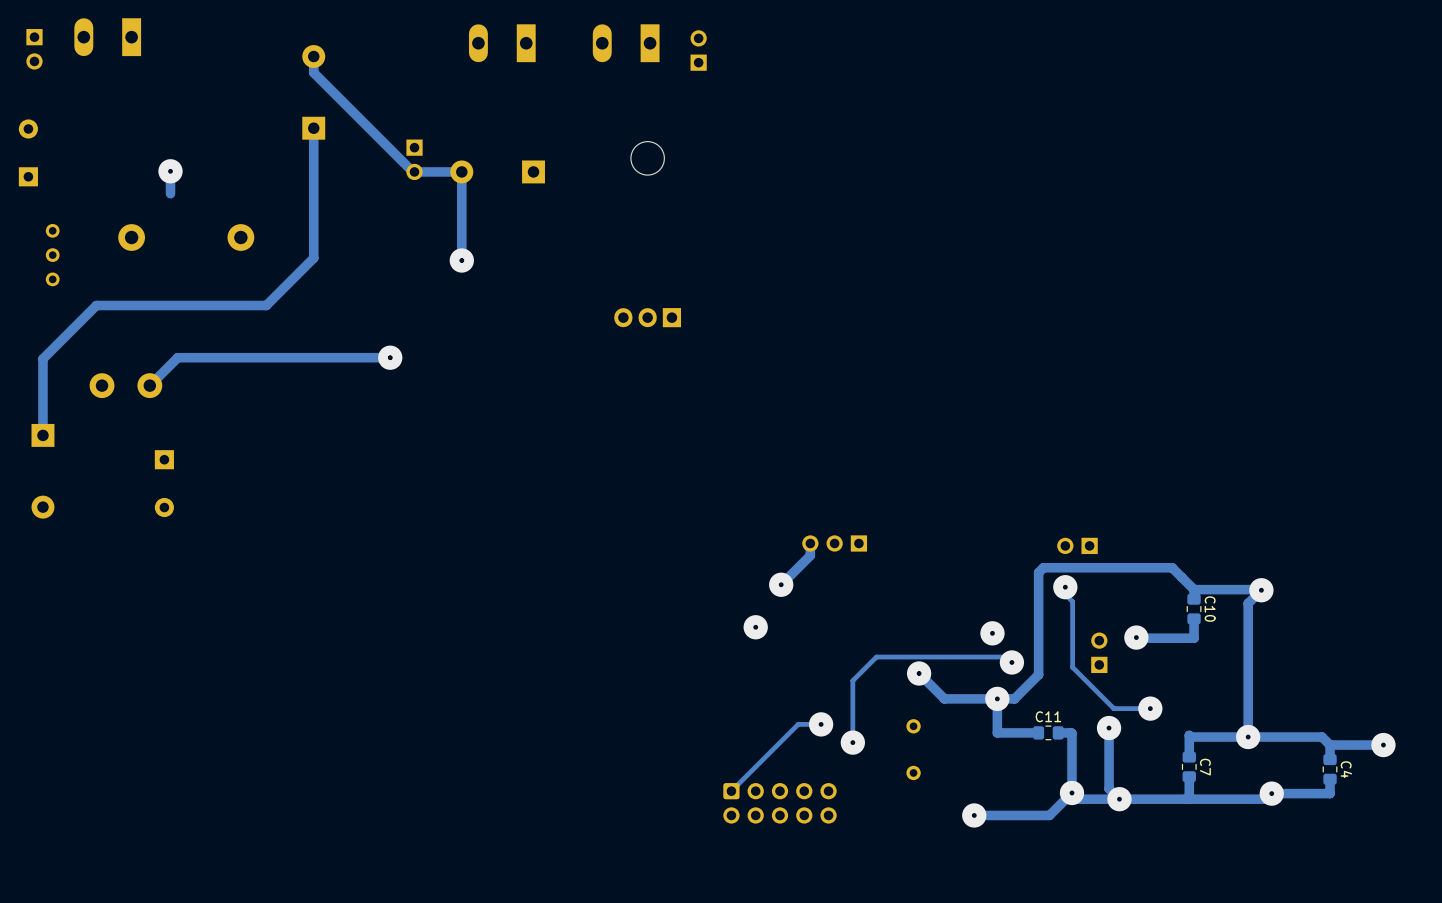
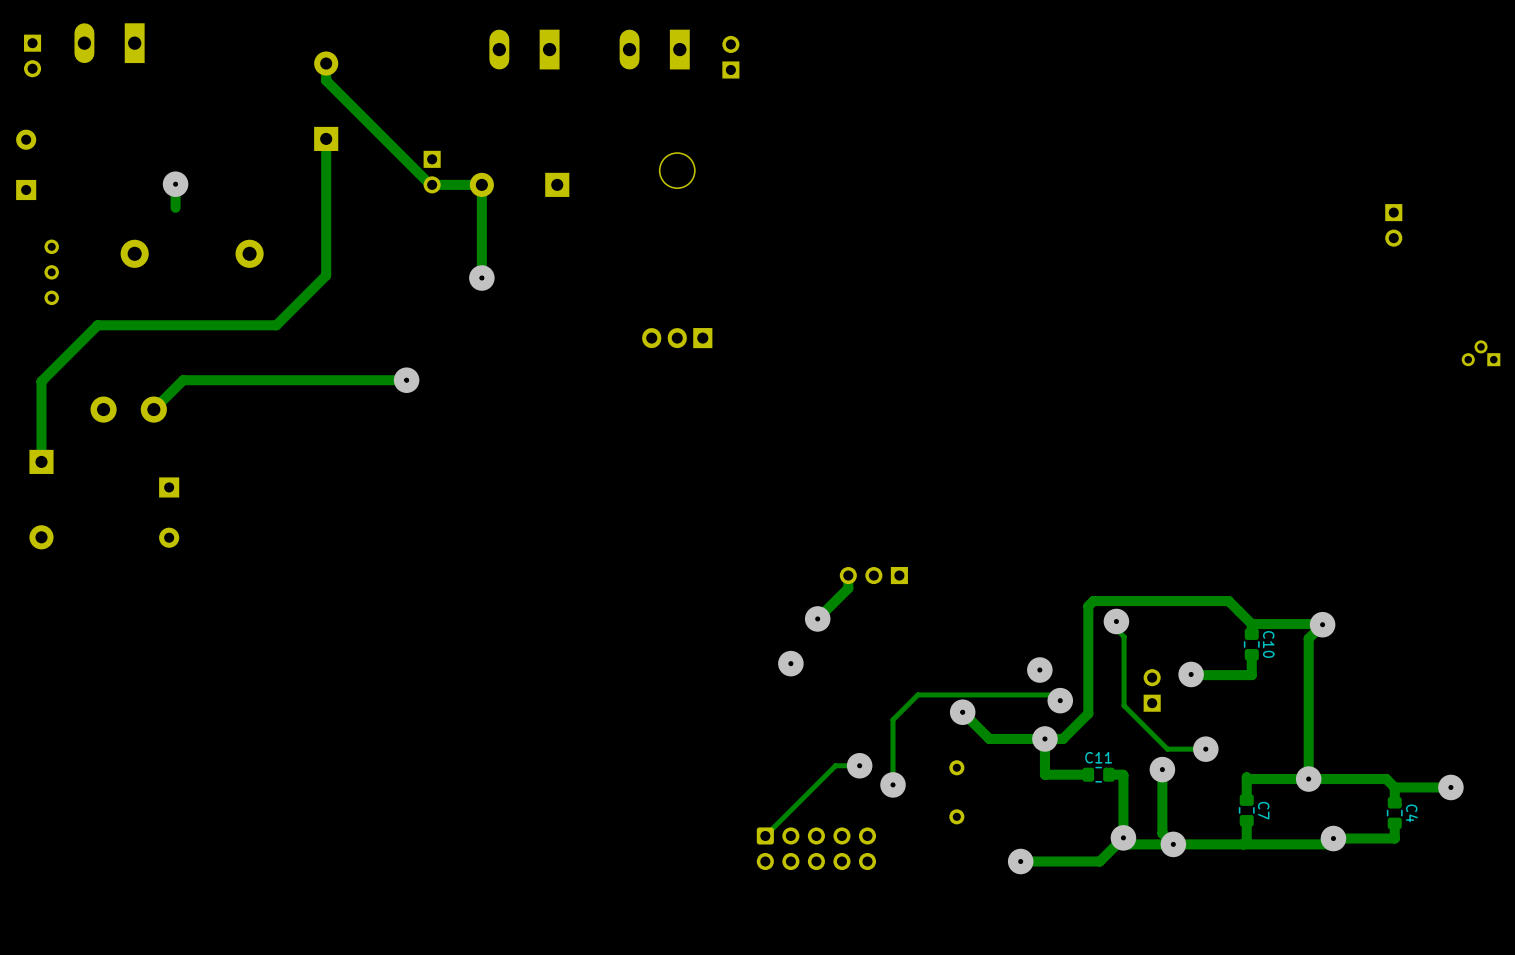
part: none -> (1393, 225)
part: none -> (1481, 353)
part: (1077, 545) -> none

